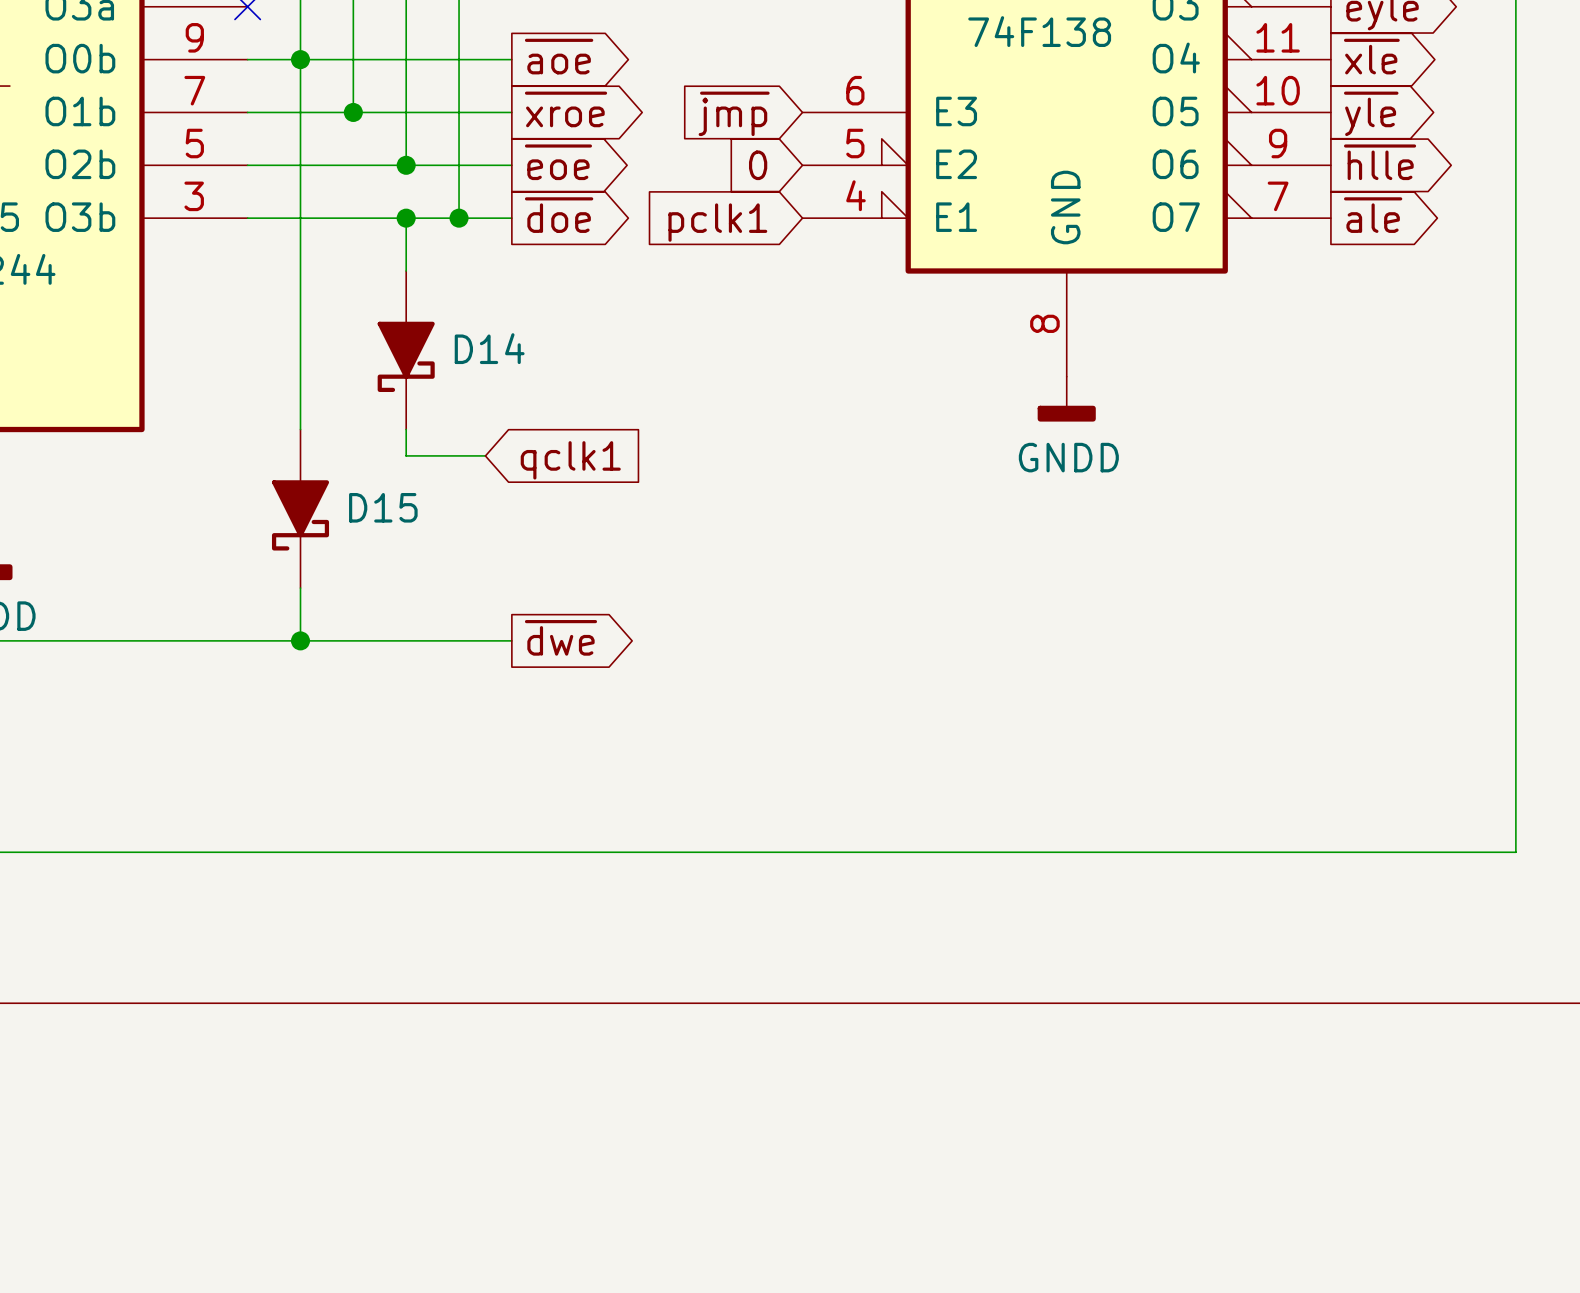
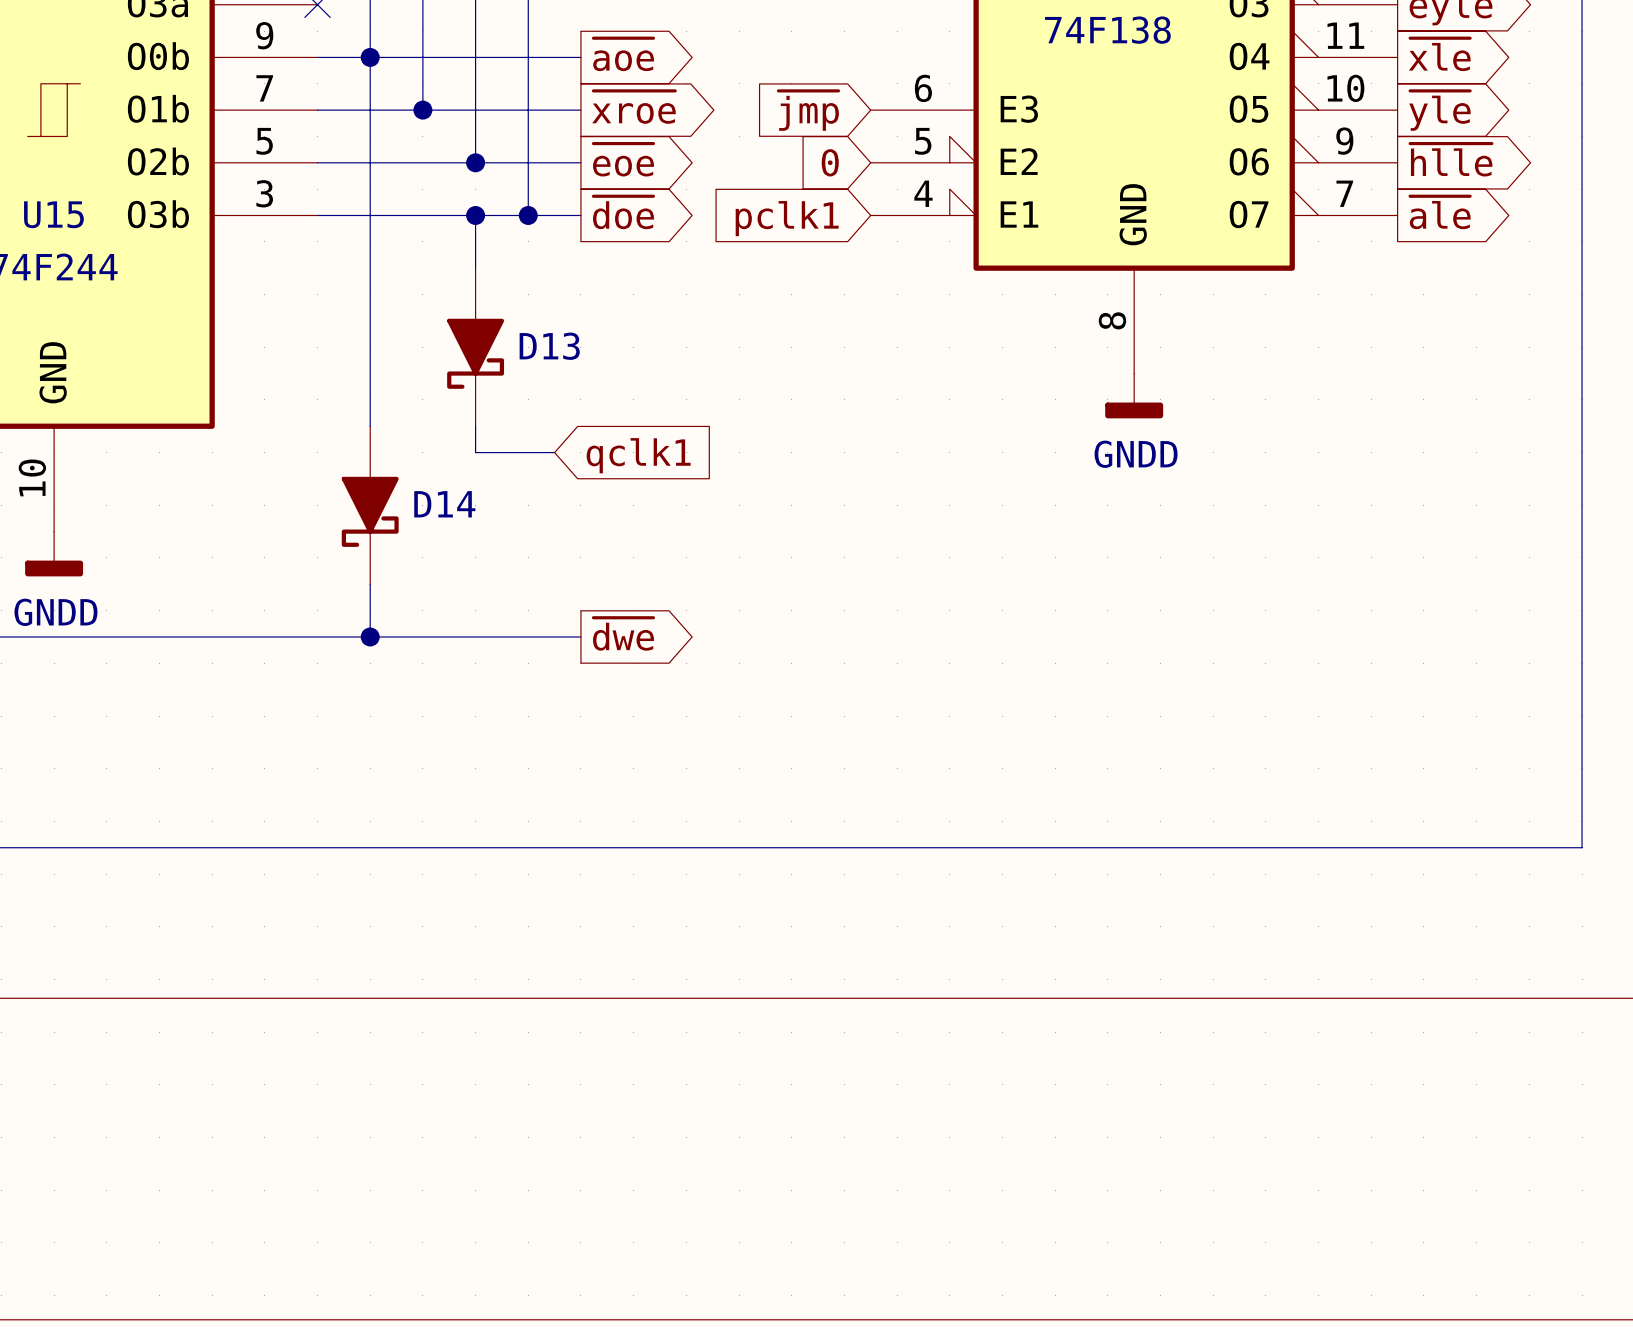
D14 name: D14 (489, 348) -> D13 (549, 346)
D15 name: D15 (383, 507) -> D14 (444, 504)

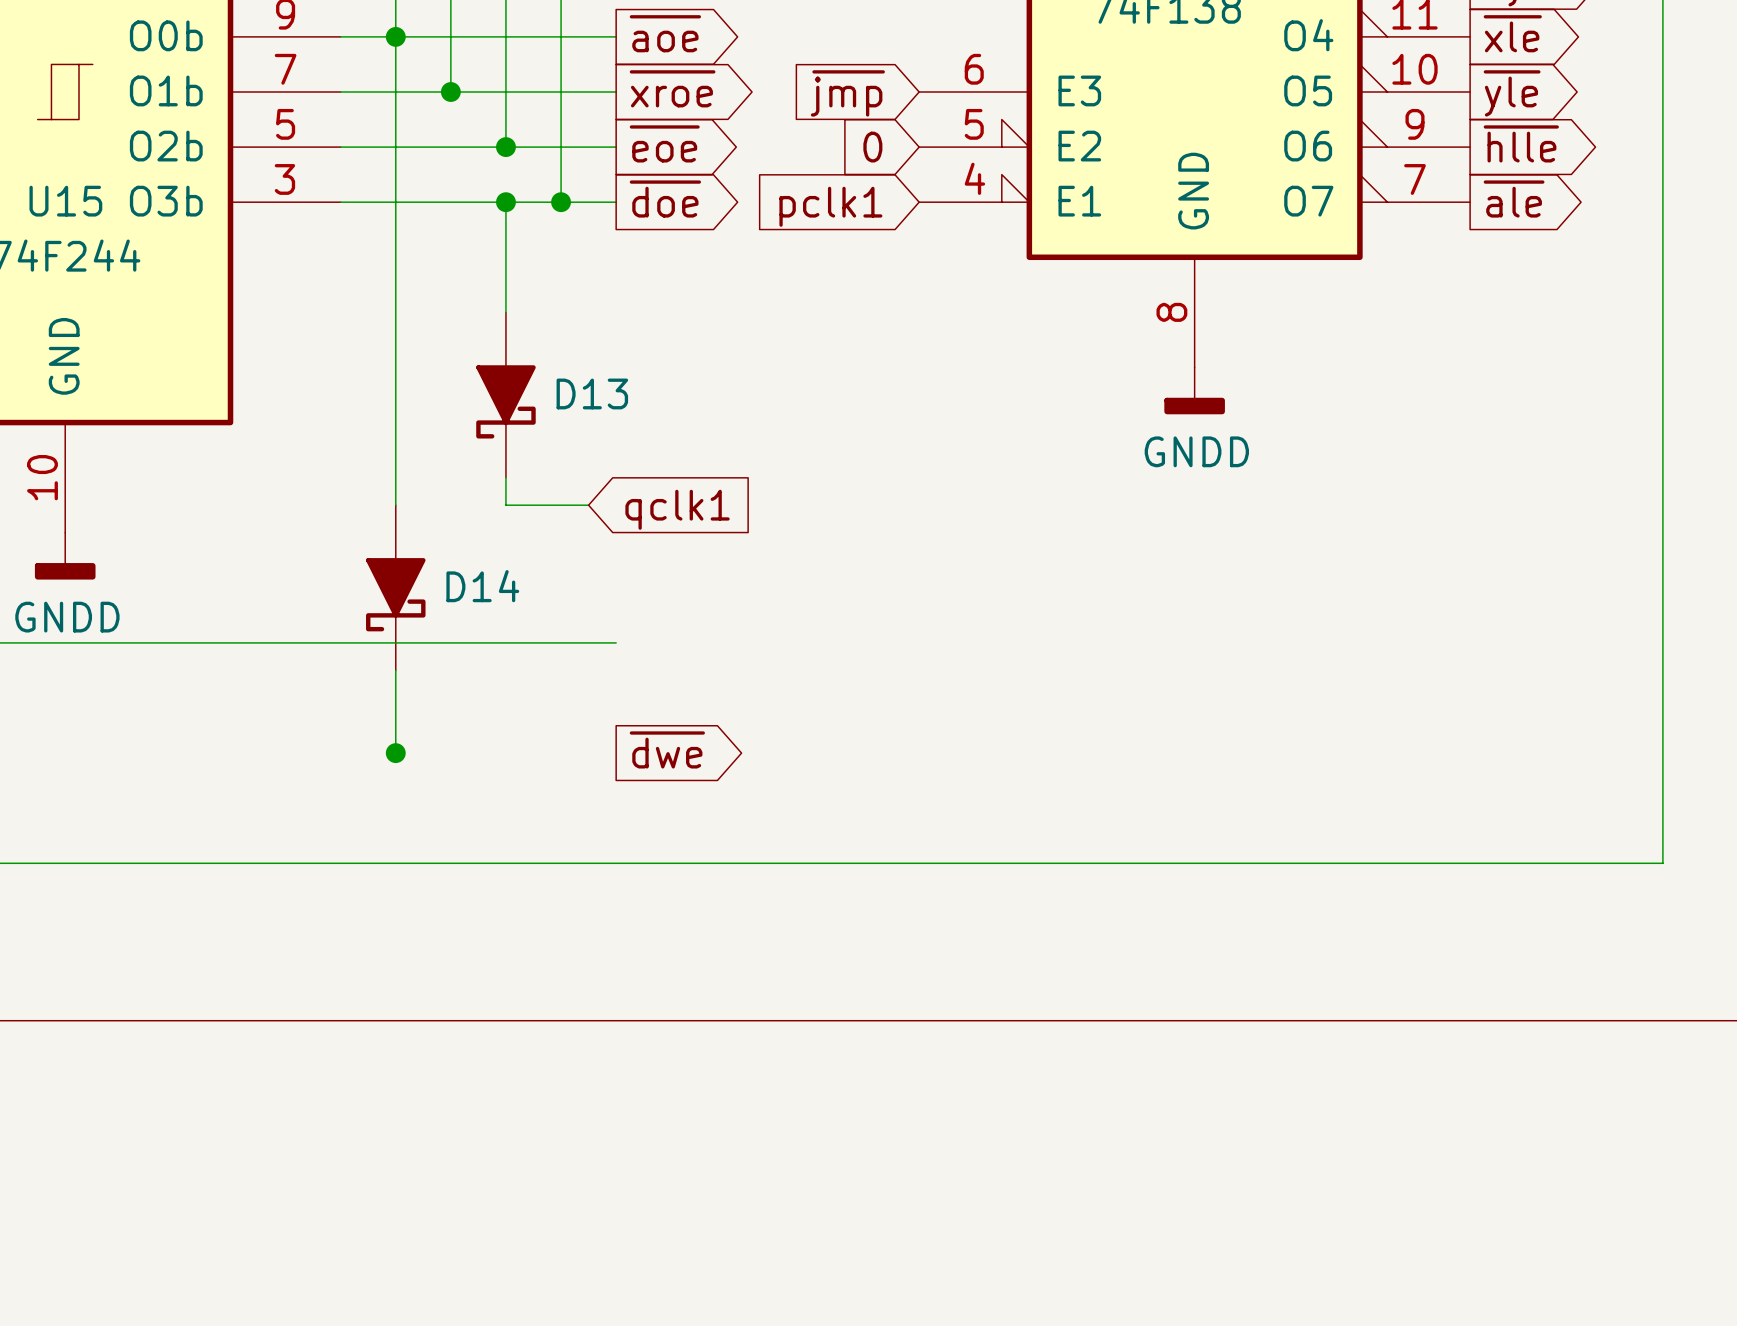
D13 position: (475, 347) -> (505, 395)
wire: (475, 426) (475, 452) (554, 452) -> (505, 477) (505, 505) (588, 505)
global label position: qclk1 (638, 455) -> qclk1 (677, 509)
D14 position: (370, 505) -> (395, 587)
global label position: ~{dwe} (623, 634) -> ~{dwe} (667, 749)
junction position: (370, 636) -> (395, 753)
wire: none -> (395, 670) (395, 753)

